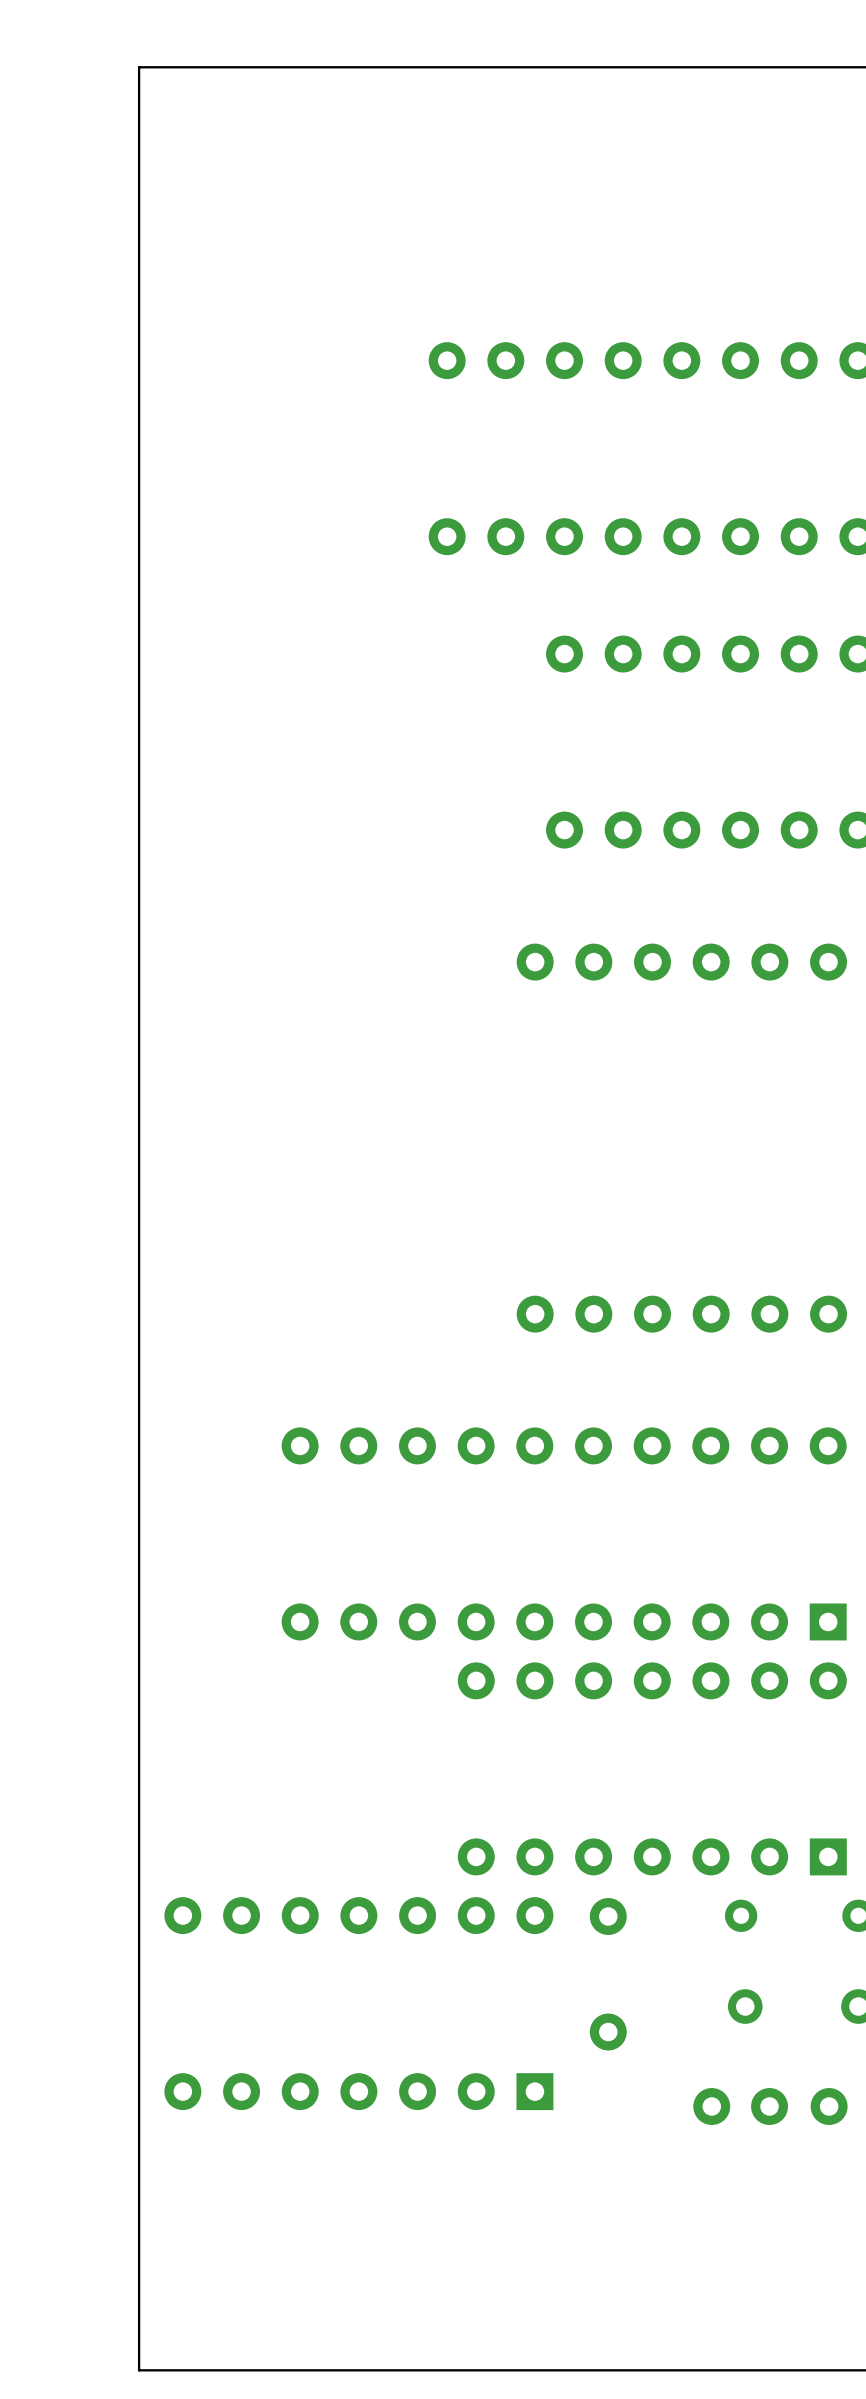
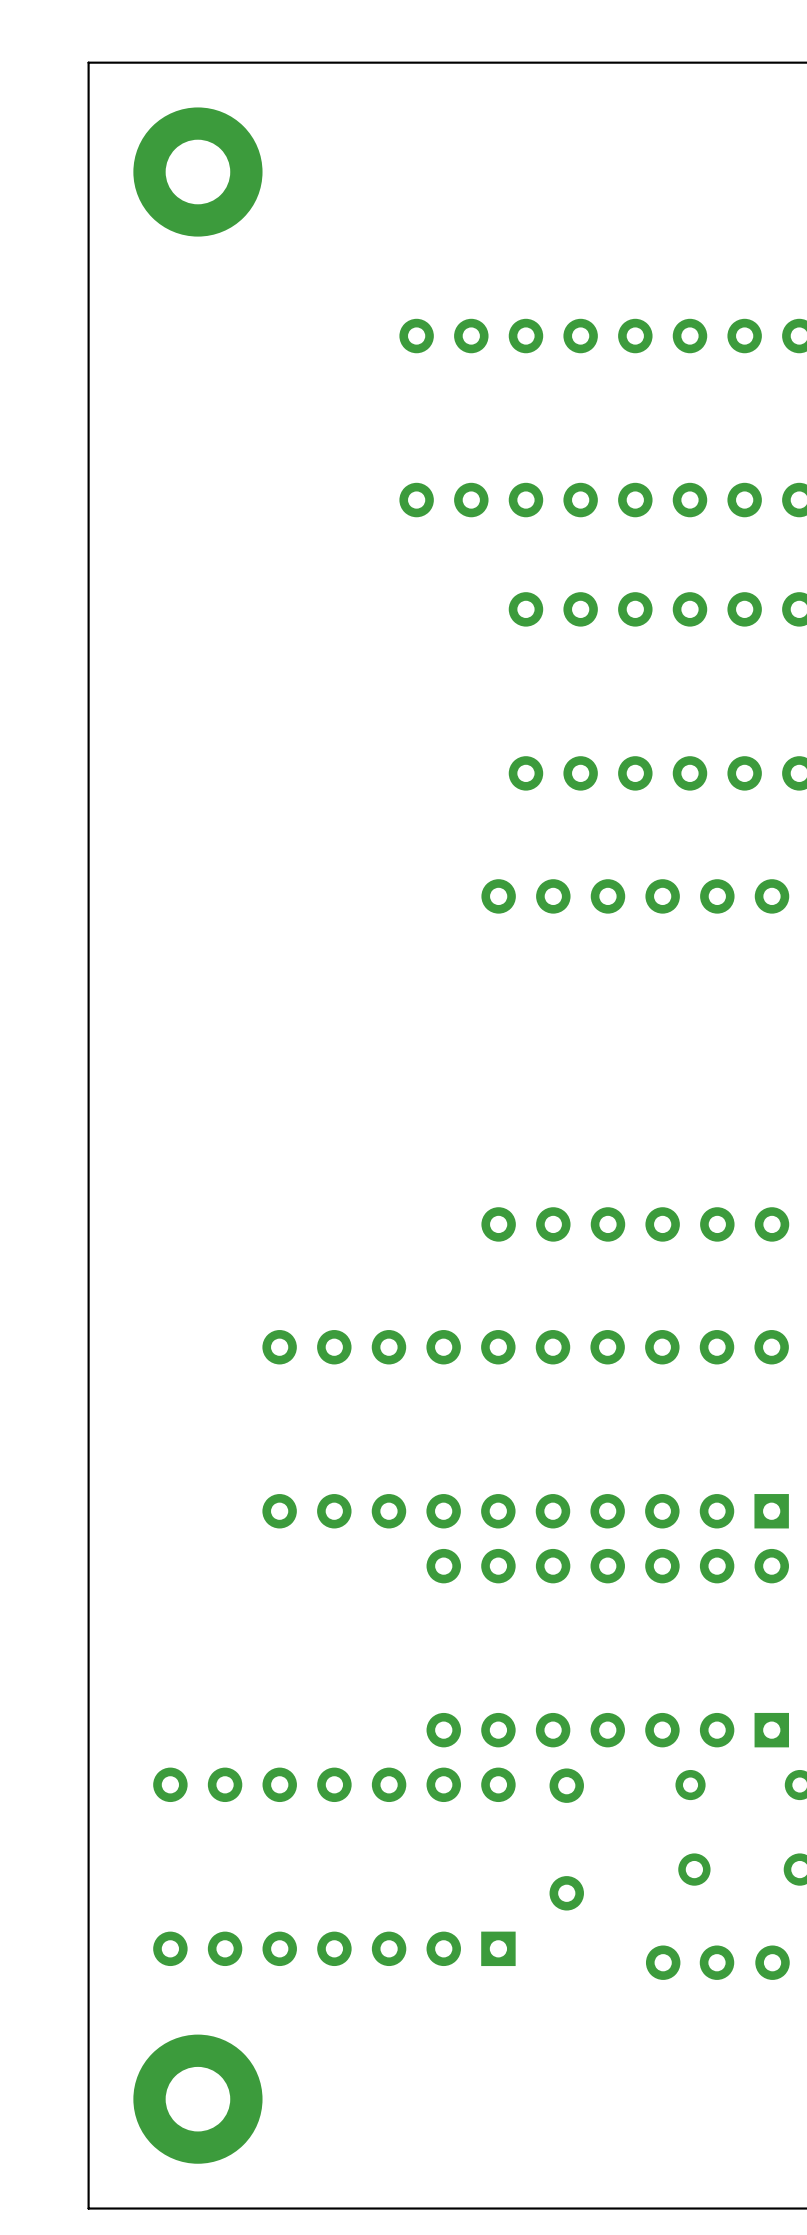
board edge: (139, 67) (139, 2370) -> (129, 62) (88, 62) (88, 2208) (129, 2208)
part: none -> (197, 172)
part: none -> (197, 2099)

